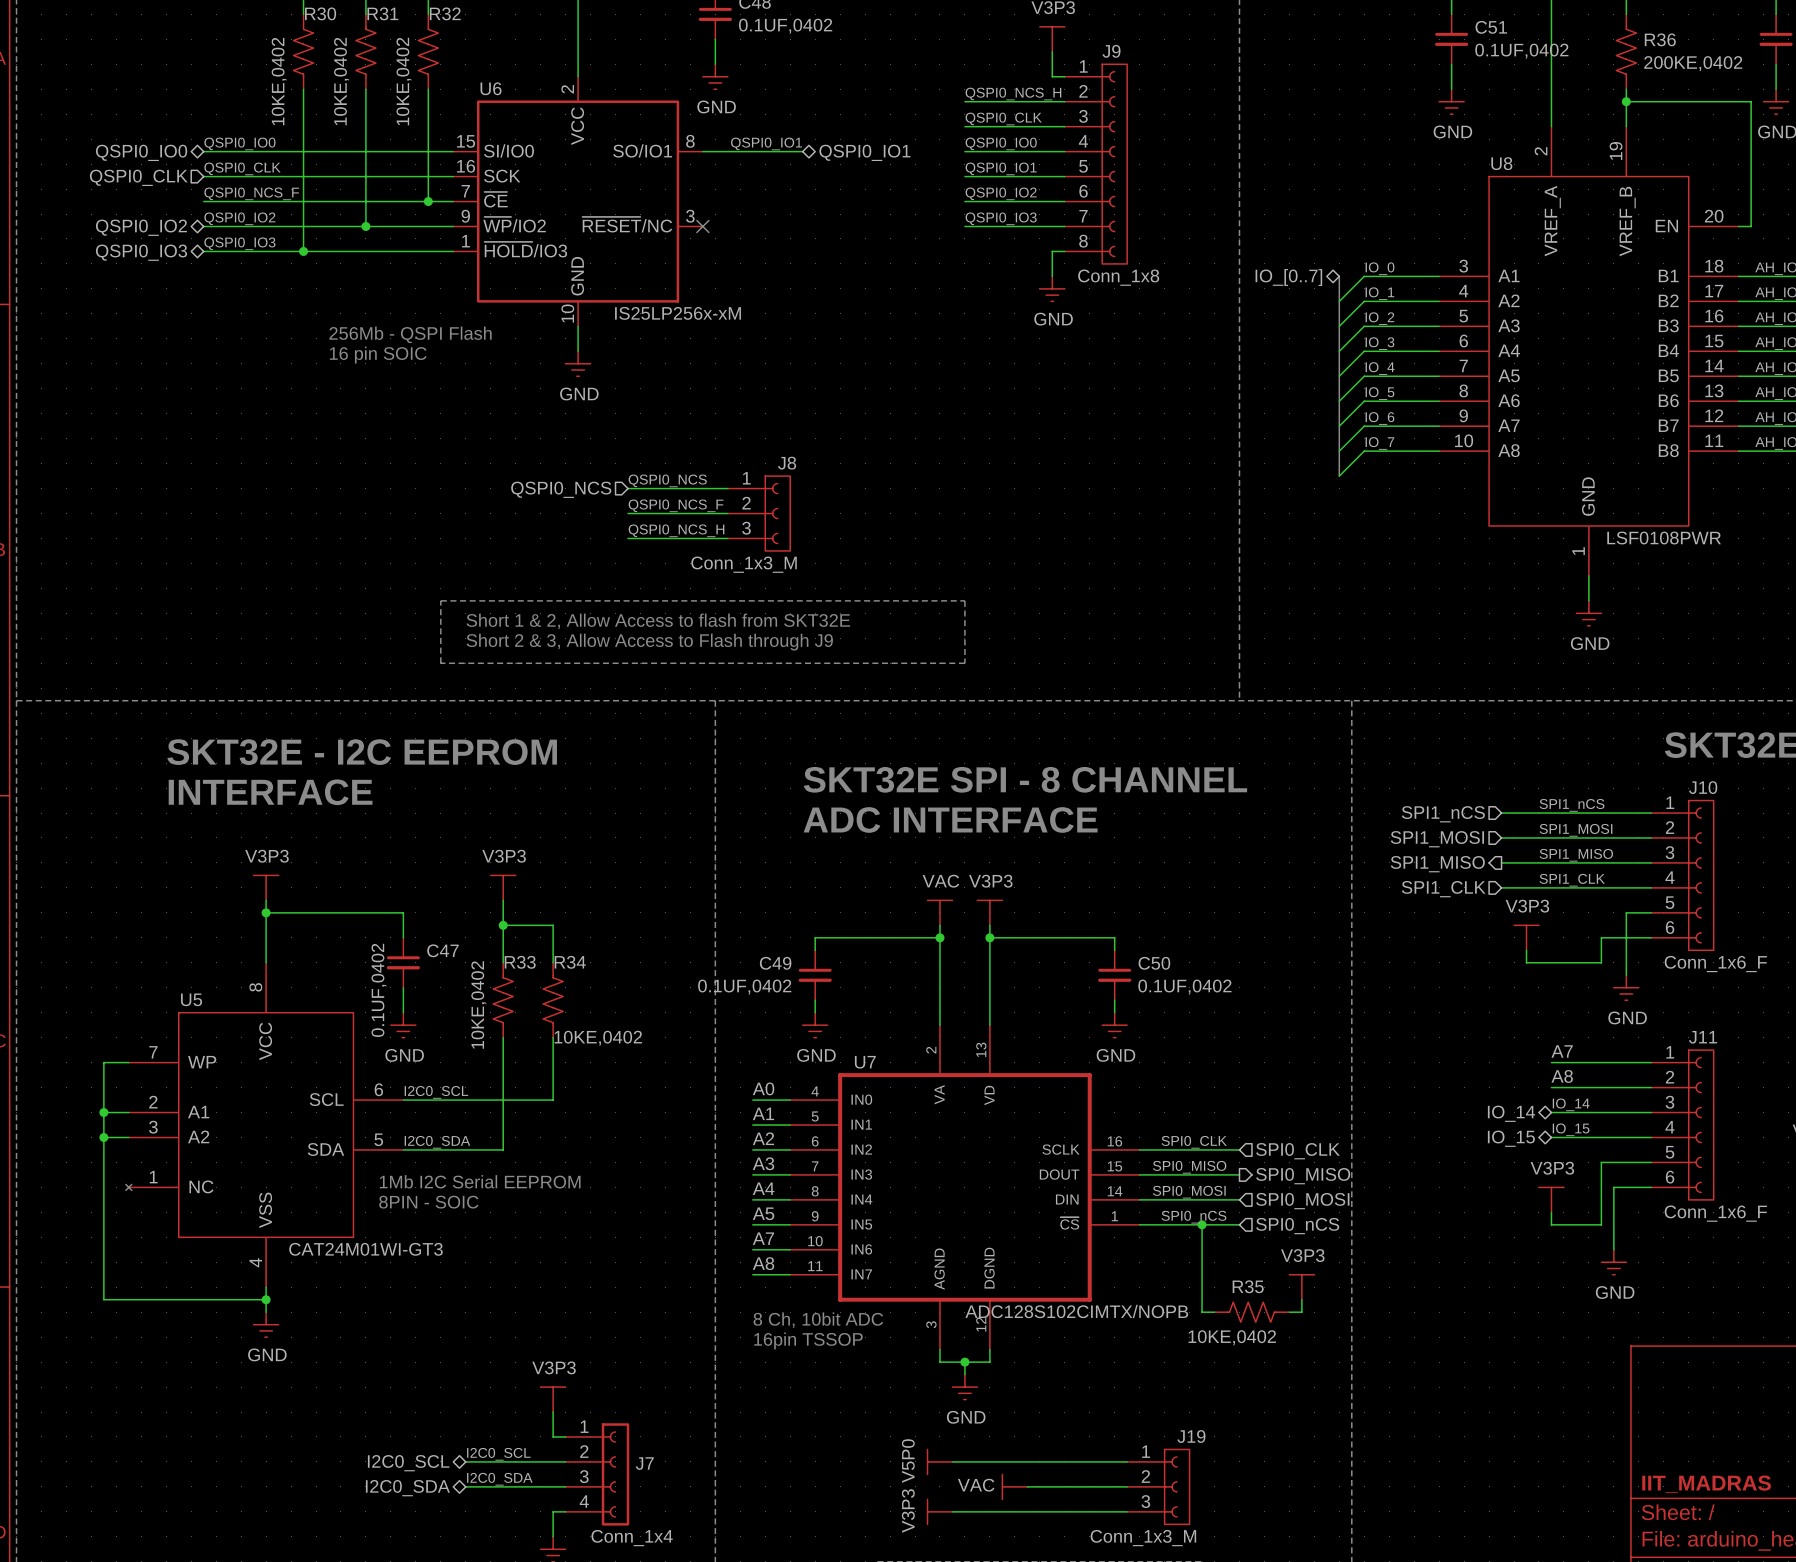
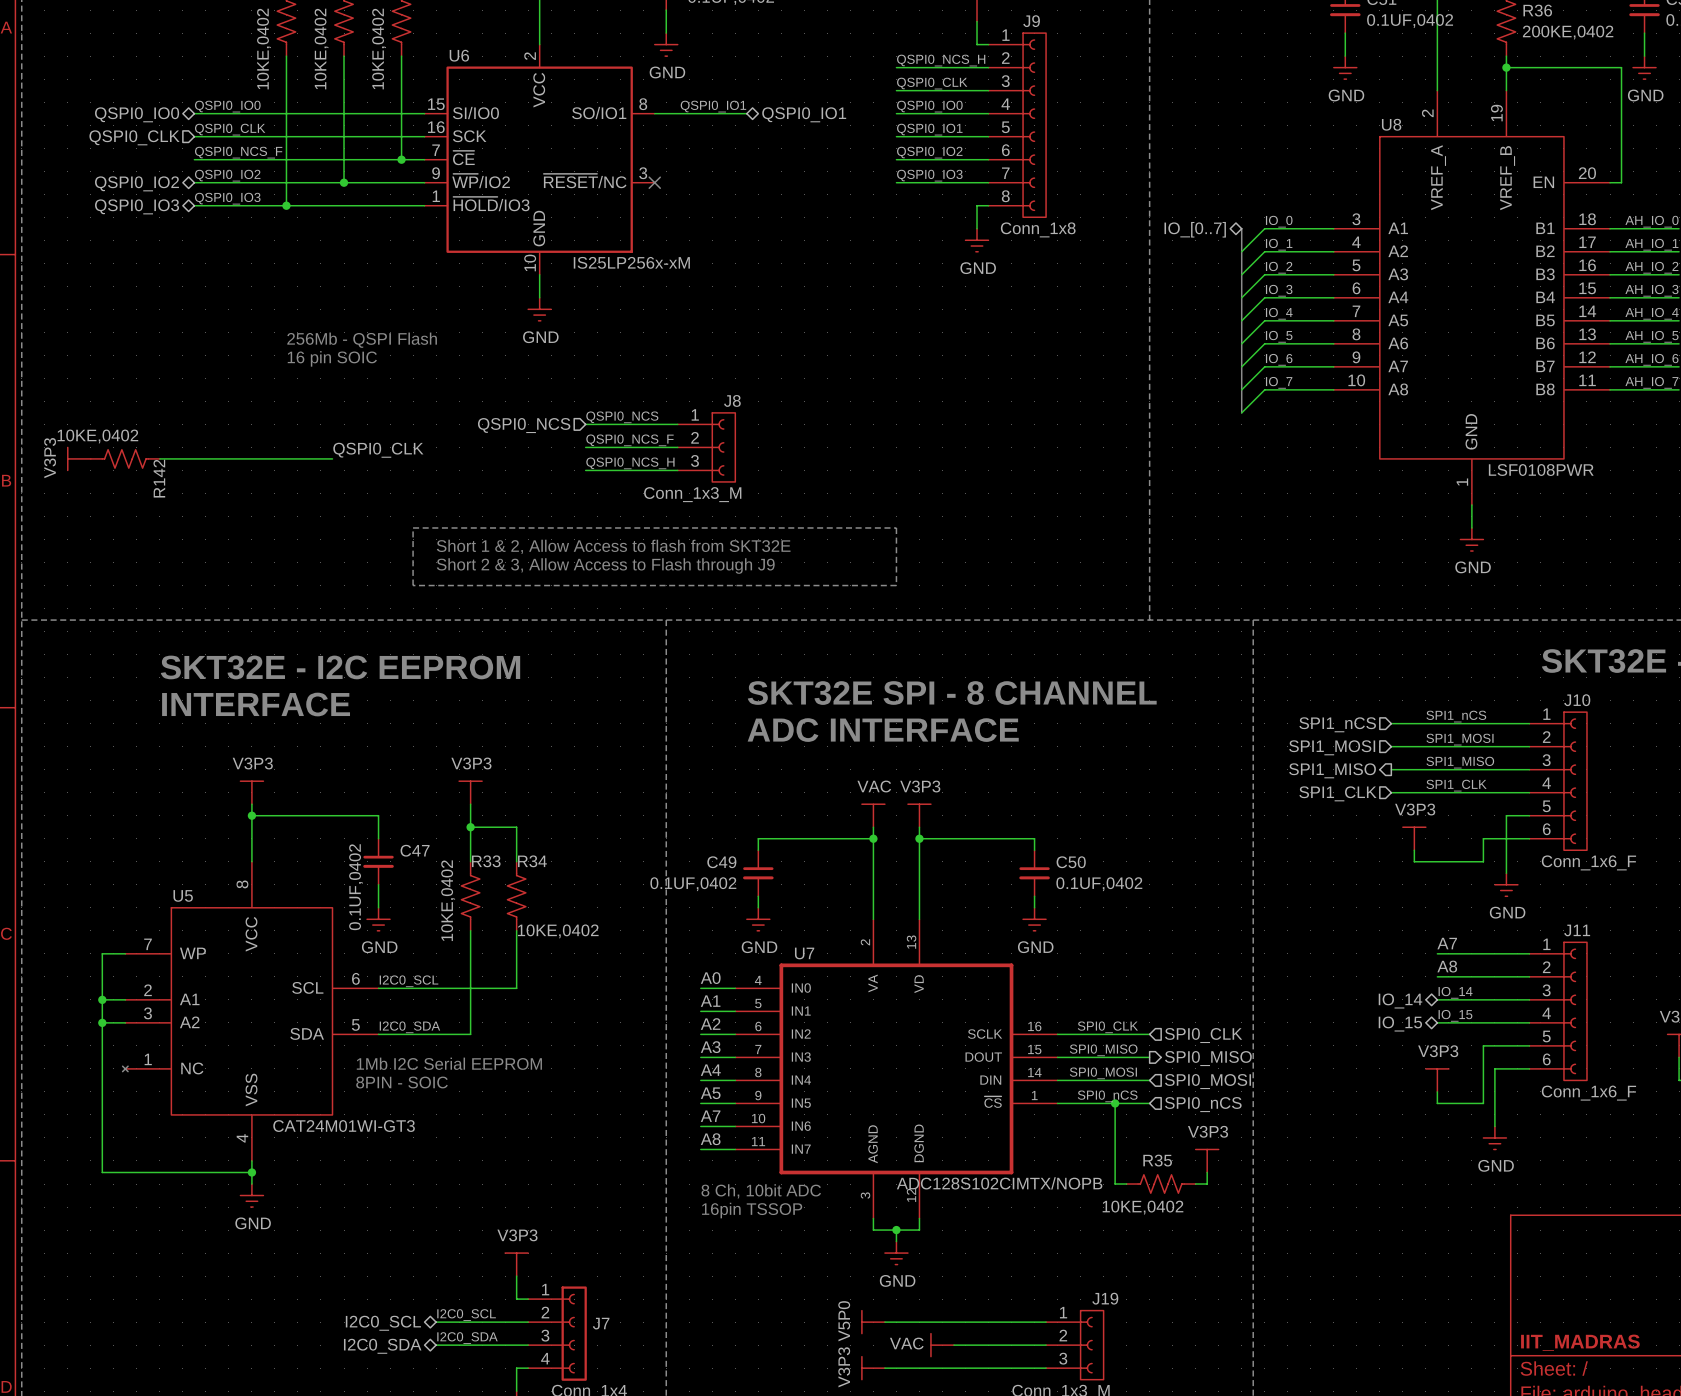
text position: 256Mb - QSPI Flash (410, 334) -> 256Mb - QSPI Flash (362, 340)
text position: 16 pin SOIC (378, 355) -> 16 pin SOIC (332, 358)
label: none -> QSPI0_CLK (378, 450)
power symbol: none -> V3P3 (79, 458)
R142: none -> 10KE,0402 (125, 458)
wire: none -> (159, 458) (332, 458)

